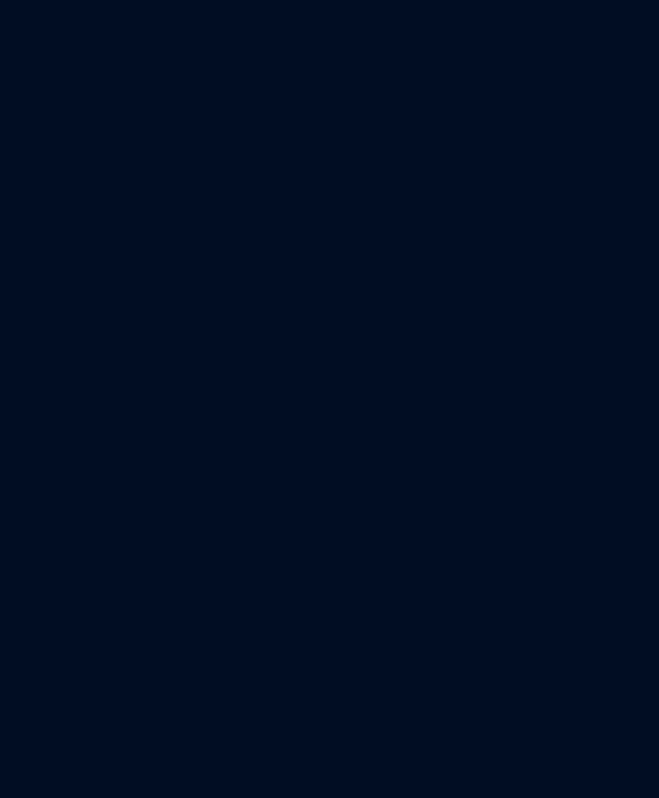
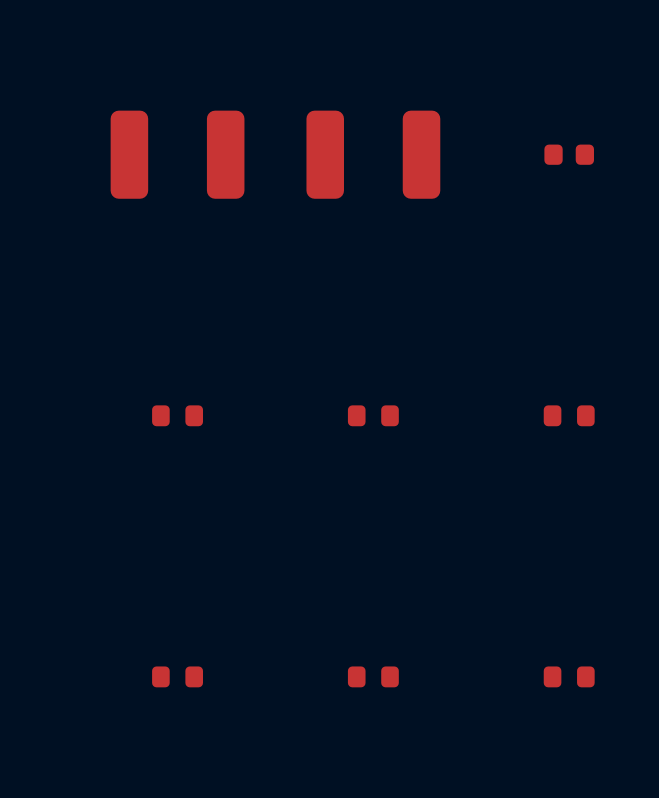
part: none -> (177, 154)
part: none -> (373, 154)
part: none -> (569, 154)
part: none -> (177, 415)
part: none -> (373, 415)
part: none -> (569, 415)
part: none -> (177, 676)
part: none -> (373, 676)
part: none -> (569, 676)

